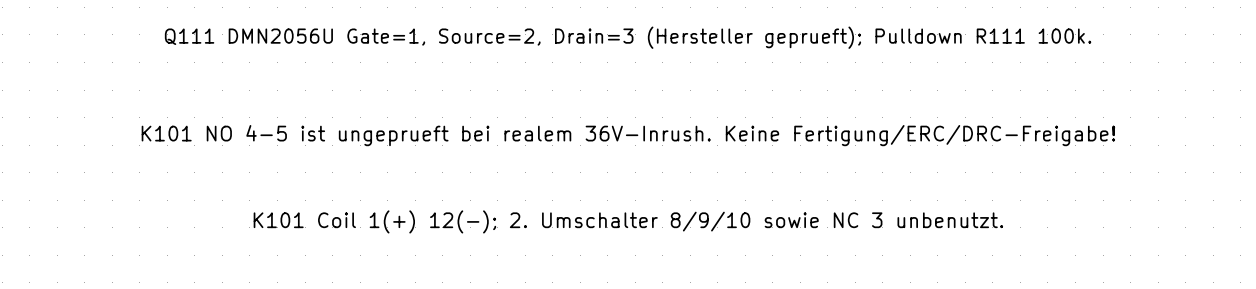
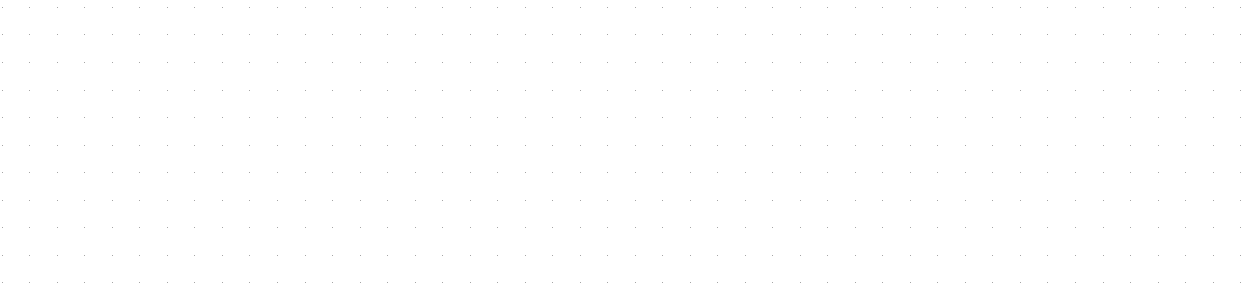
text: Q111 DMN2056U Gate=1, Source=2, Drain=3 (Hersteller geprueft); Pulldown R111 100k. (628, 37) -> none
text: K101 NO 4-5 ist ungeprueft bei realem 36V-Inrush. Keine Fertigung/ERC/DRC-Freigabe! (628, 135) -> none
text: K101 Coil 1(+) 12(-); 2. Umschalter 8/9/10 sowie NC 3 unbenutzt. (628, 221) -> none

